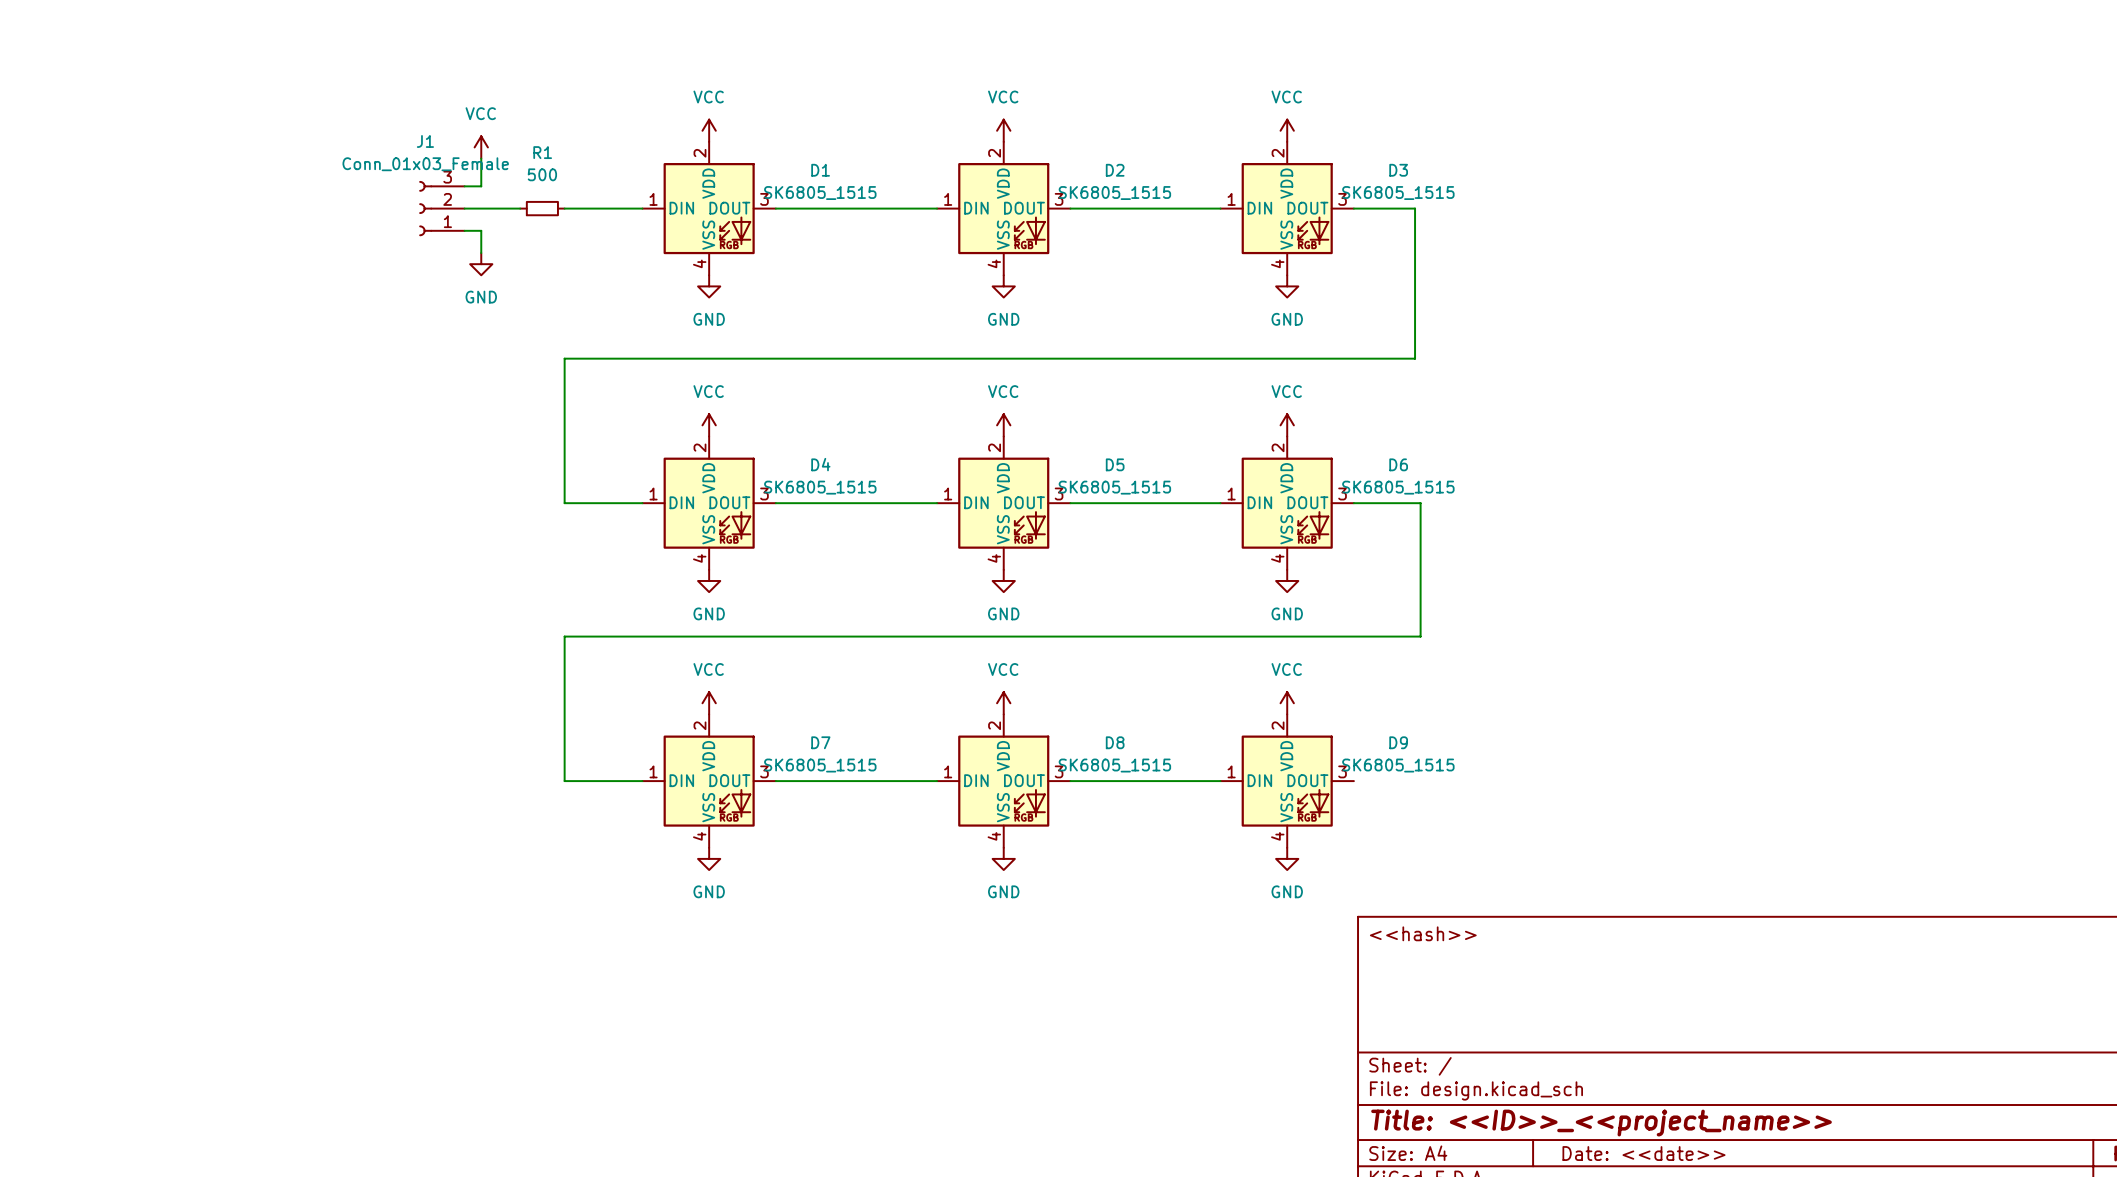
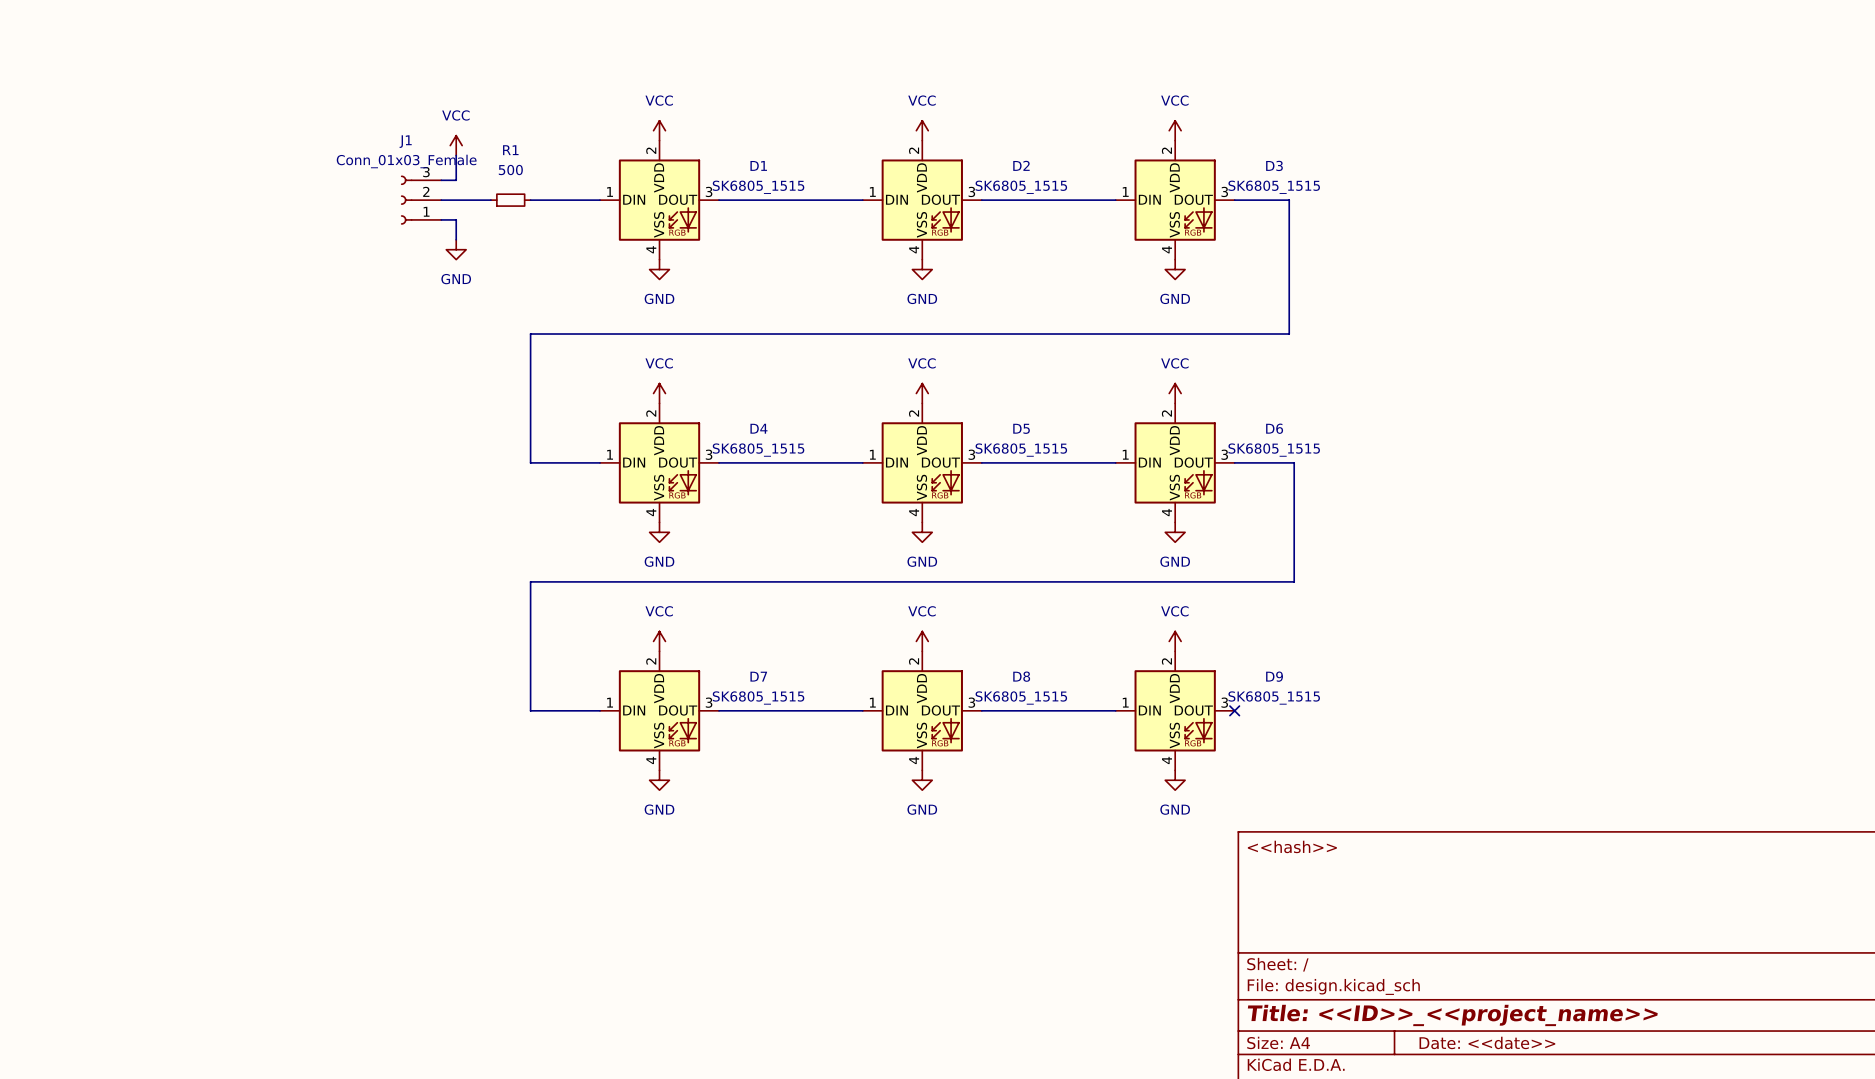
no-connect mark: none -> (1234, 710)

